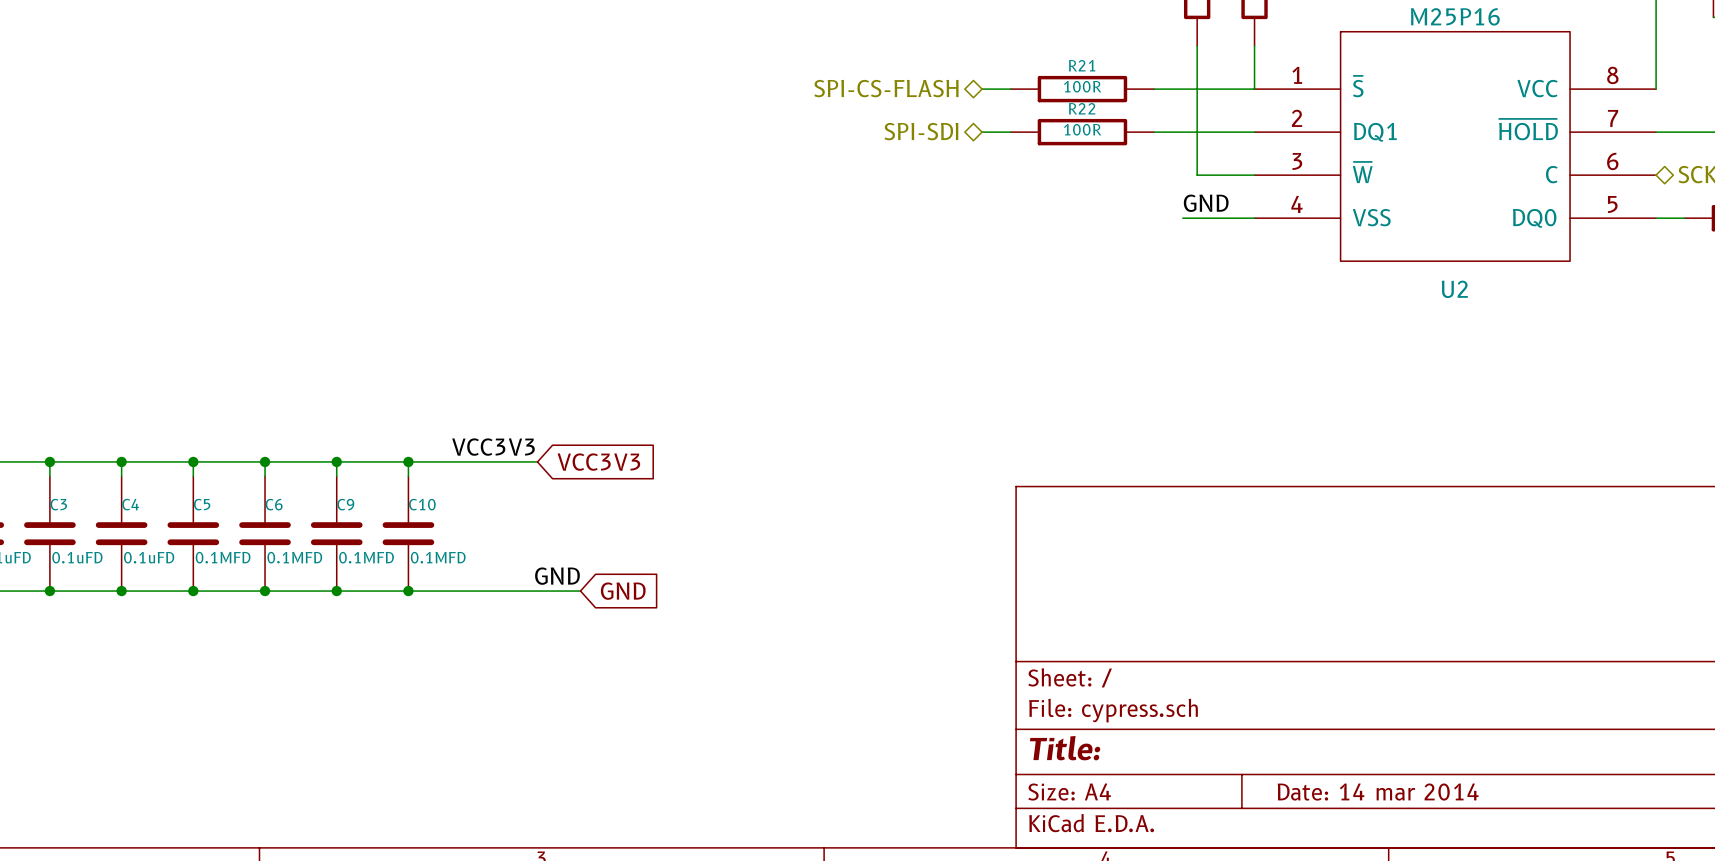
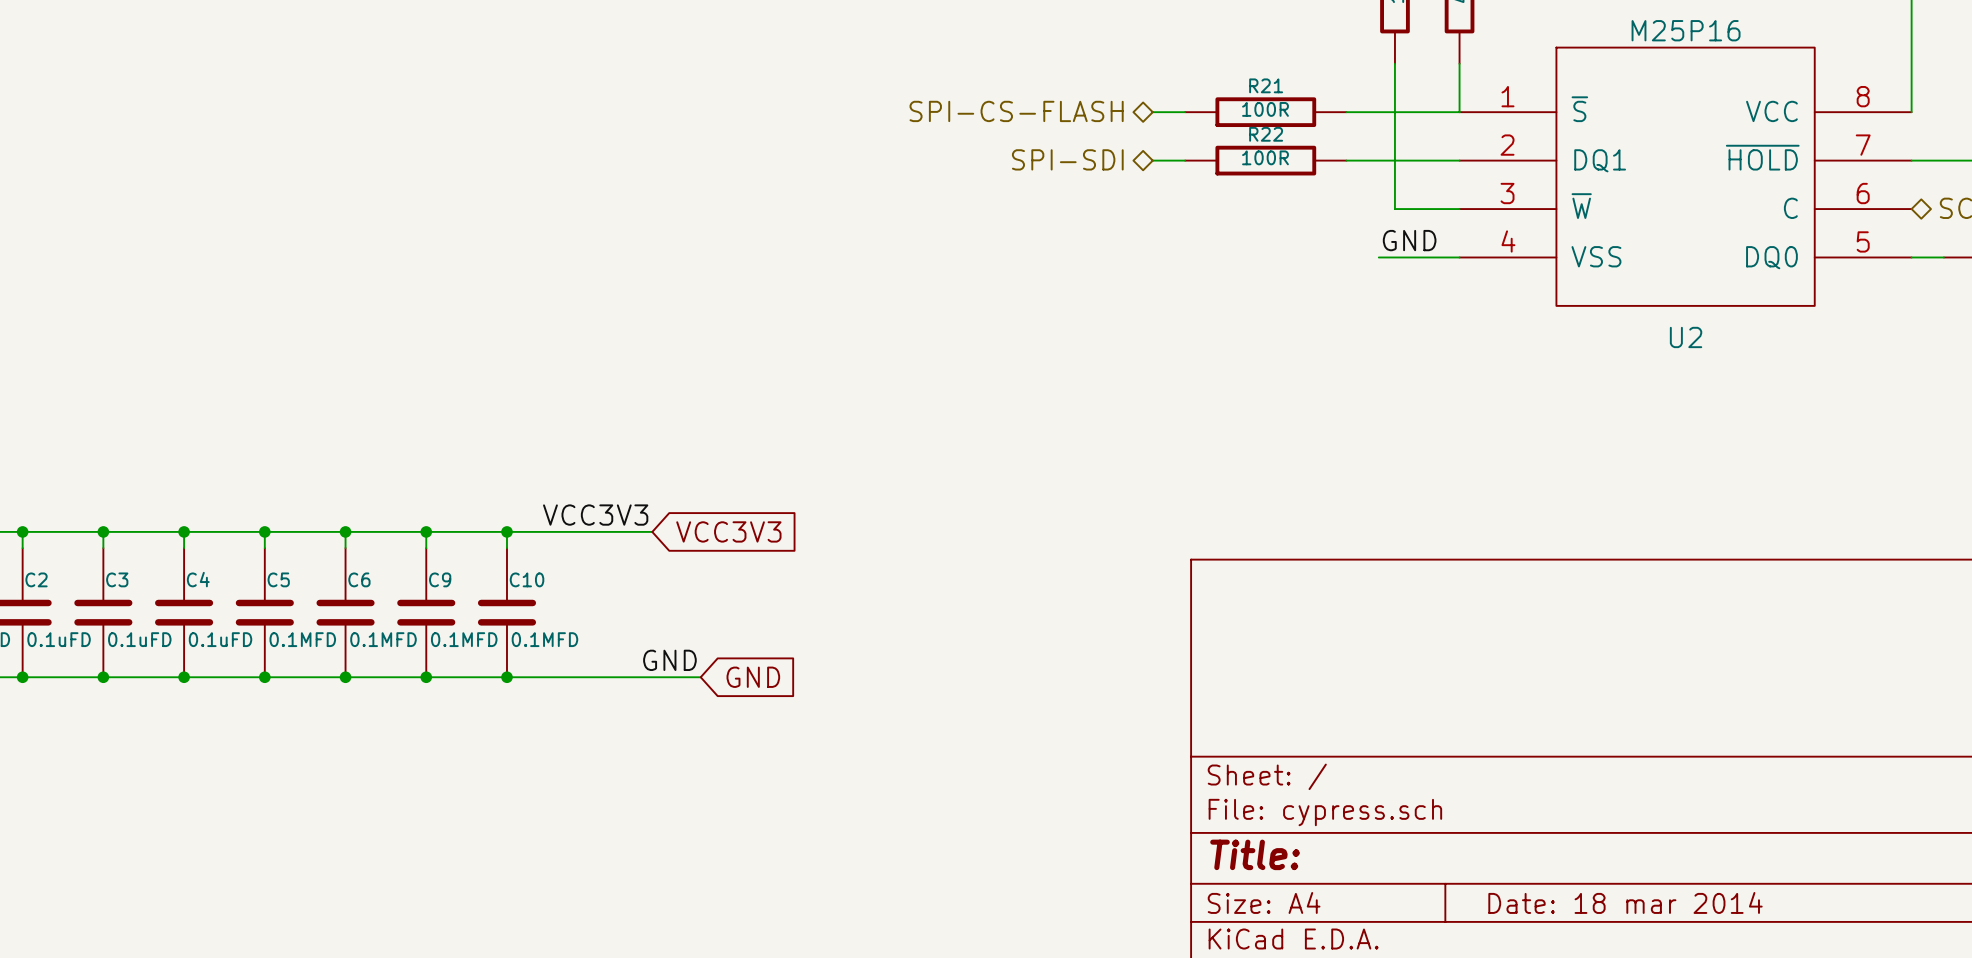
title block: Date: 14 mar 2014 (1378, 792) -> Date: 18 mar 2014 (1625, 902)

